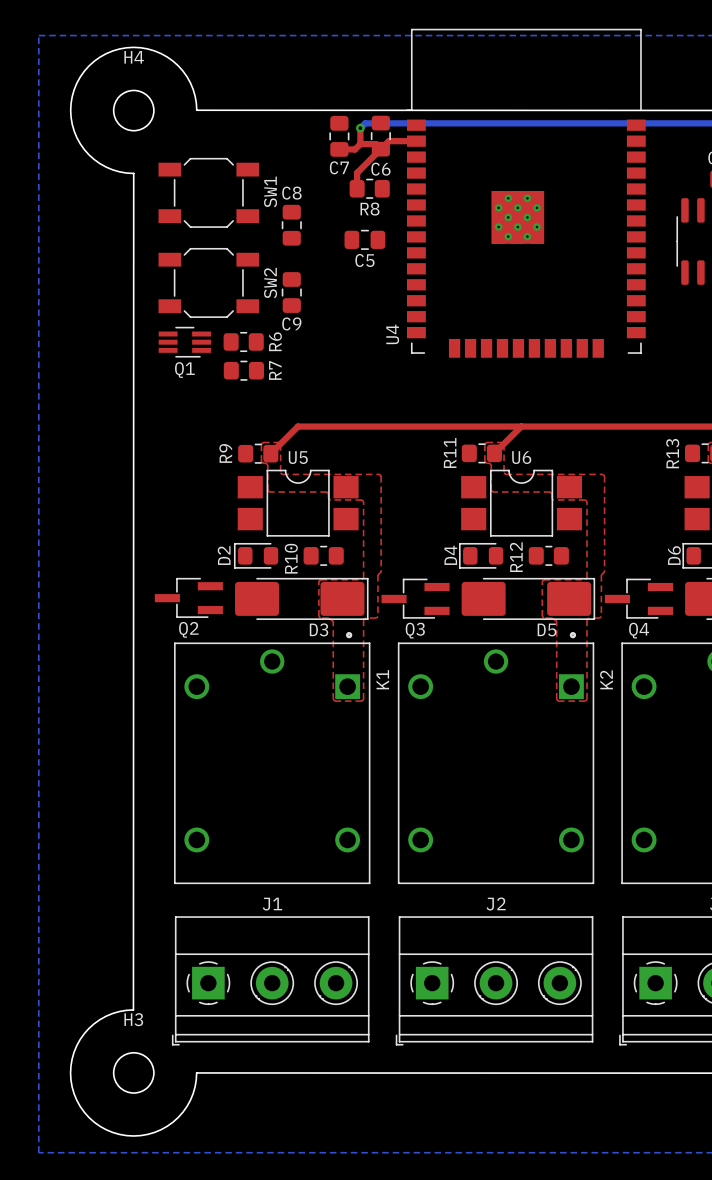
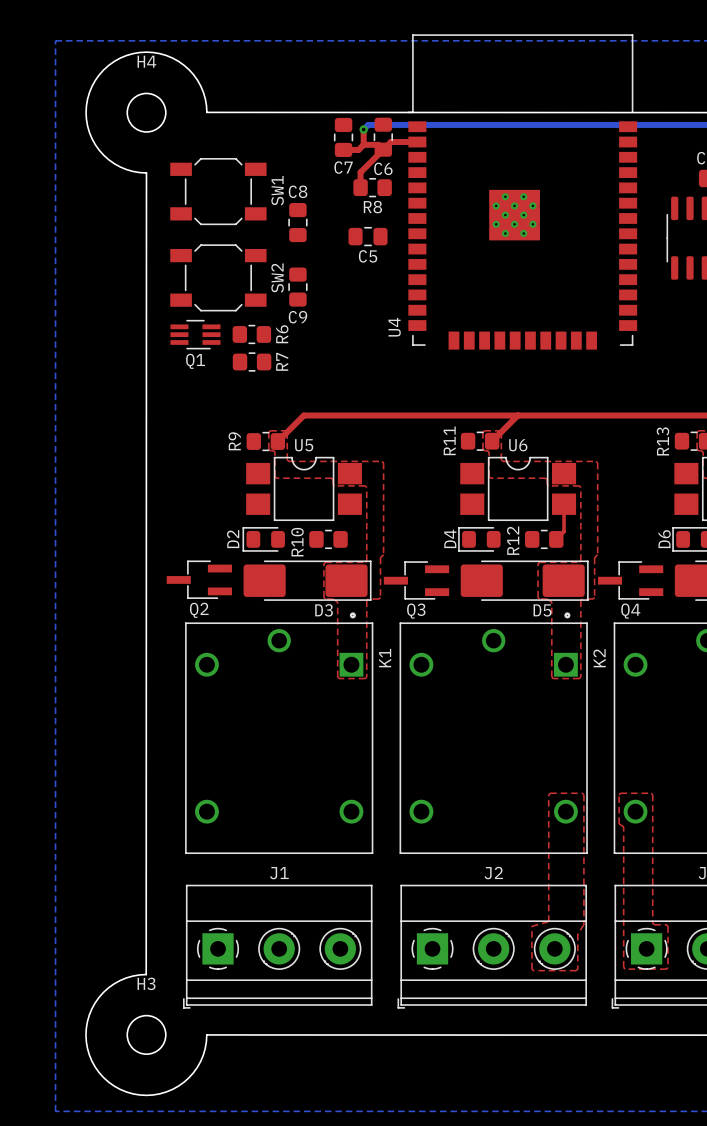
top track: none -> (564, 504) (564, 531) (556, 539)
top zone outline: none -> (550, 793) (548, 794) (548, 921) (531, 926) (531, 969) (576, 970) (577, 933) (583, 924) (583, 794) (550, 793)
top zone outline: none -> (620, 793) (652, 794) (652, 923) (668, 926) (666, 969) (623, 967) (623, 826) (619, 823) (620, 793)

